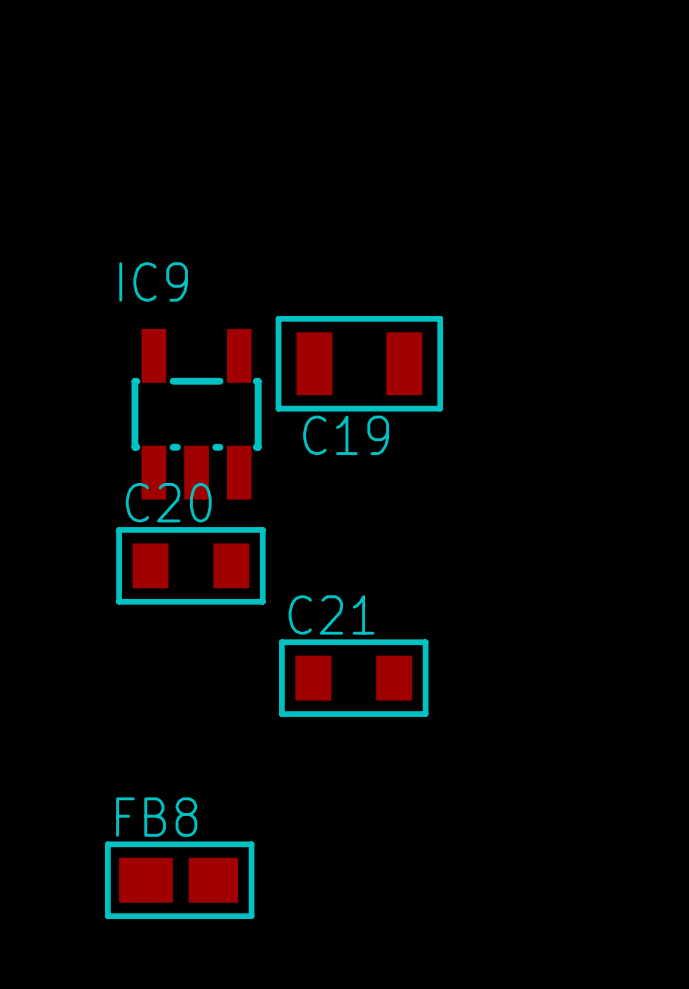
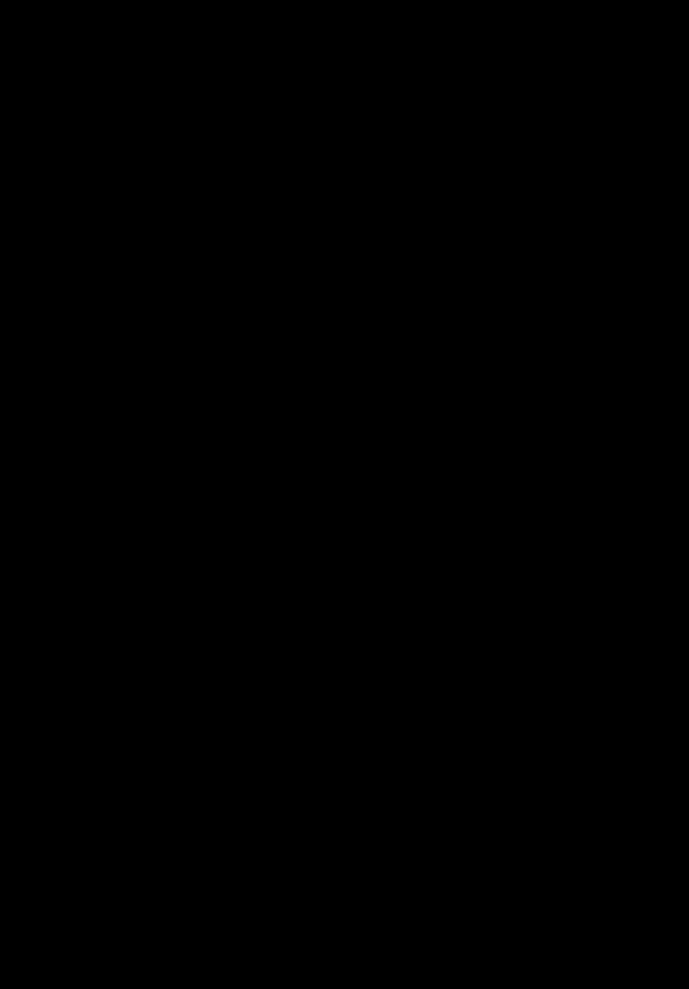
C19: (359, 363) -> none
IC9: (196, 414) -> none
C20: (190, 565) -> none
C21: (353, 678) -> none
FB8: (179, 880) -> none

